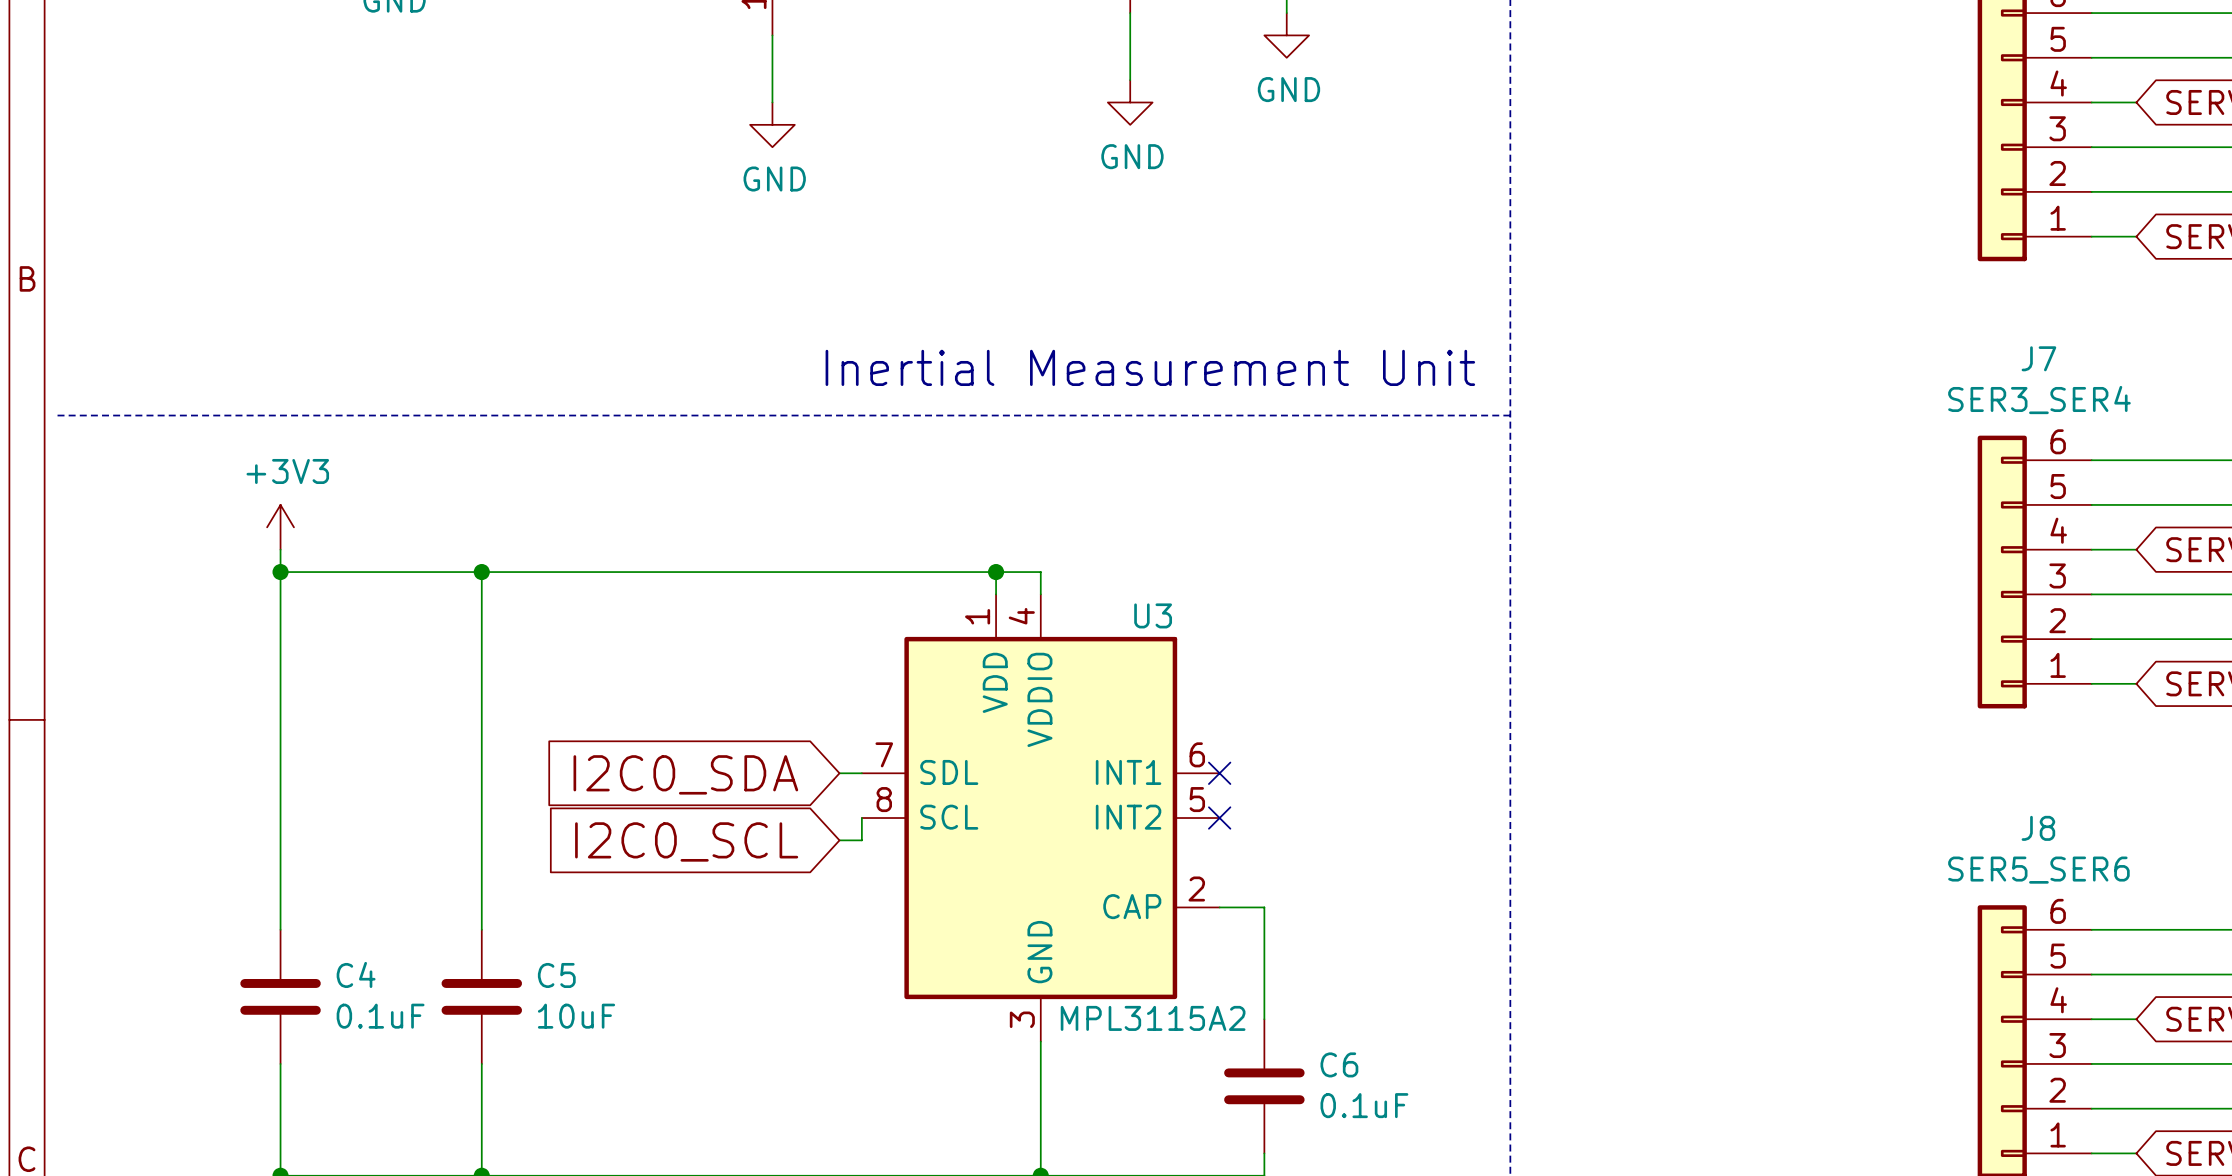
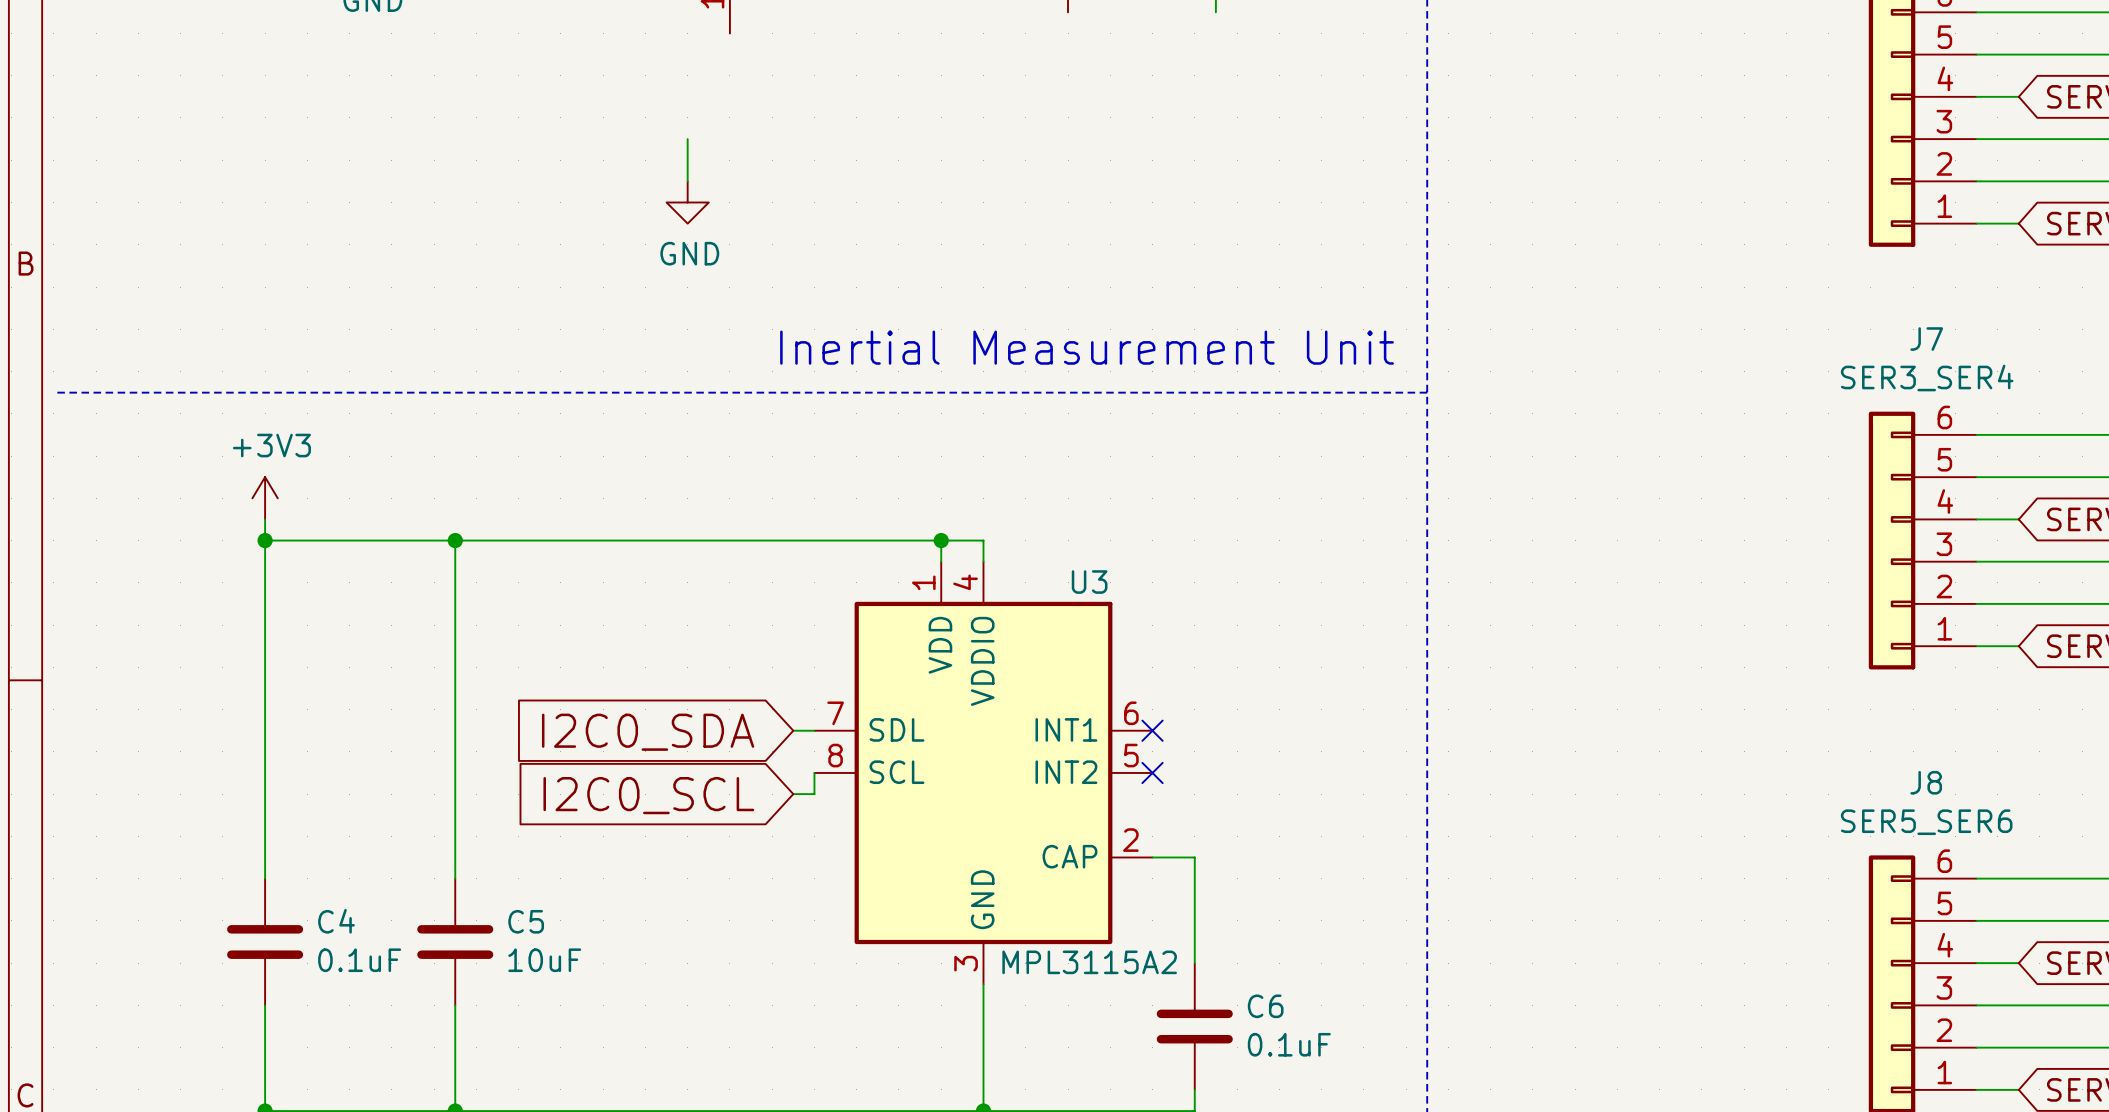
wire: (1130, 13) (1130, 80) -> none
wire: (772, 35) (772, 102) -> none
power symbol: GND (1286, 35) -> none
power symbol: GND (1130, 102) -> none
power symbol position: GND (772, 124) -> GND (687, 202)
wire: none -> (687, 139) (687, 181)

